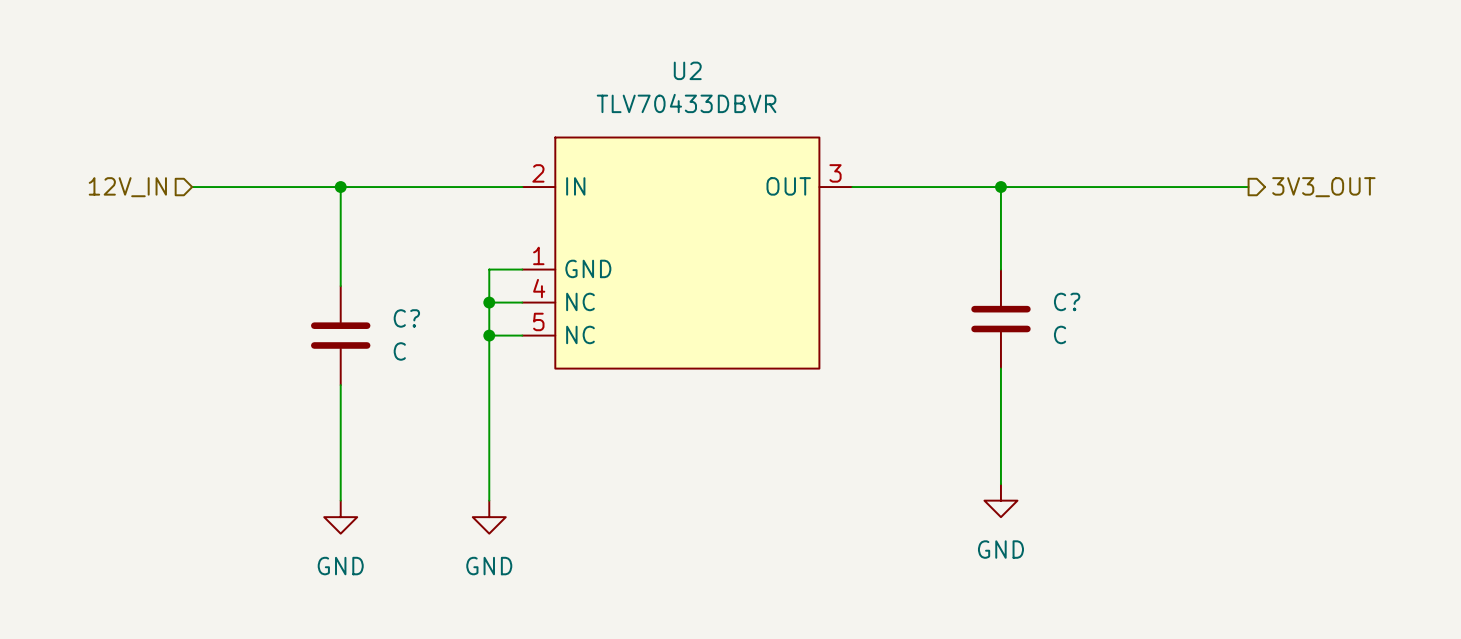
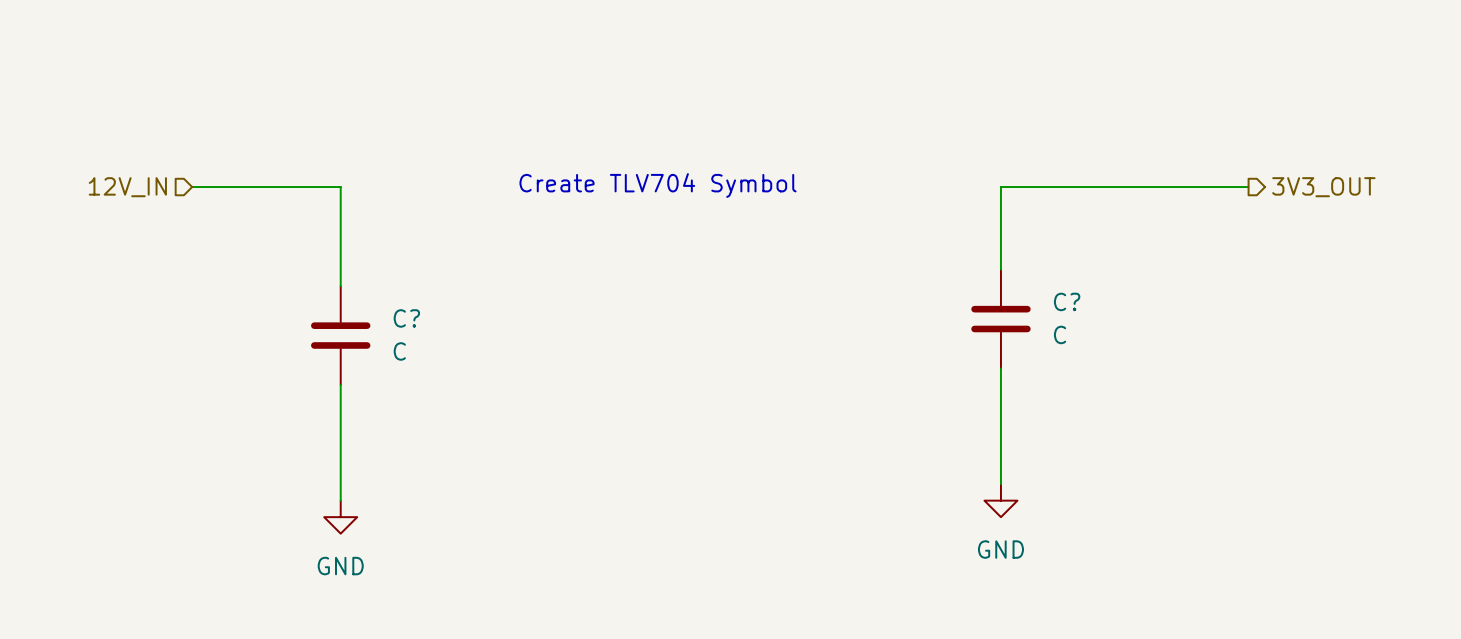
text: none -> Create TLV704 Symbol (658, 185)
wire: (340, 187) (522, 187) -> none
junction: (340, 187) -> none
wire: (852, 187) (1000, 187) -> none
junction: (1000, 187) -> none
U2: TLV70433DBVR (687, 253) -> none
wire: (522, 269) (489, 269) (489, 500) -> none
wire: (489, 302) (522, 302) -> none
junction: (489, 302) -> none
wire: (489, 335) (522, 335) -> none
junction: (489, 335) -> none
power symbol: GND (489, 517) -> none

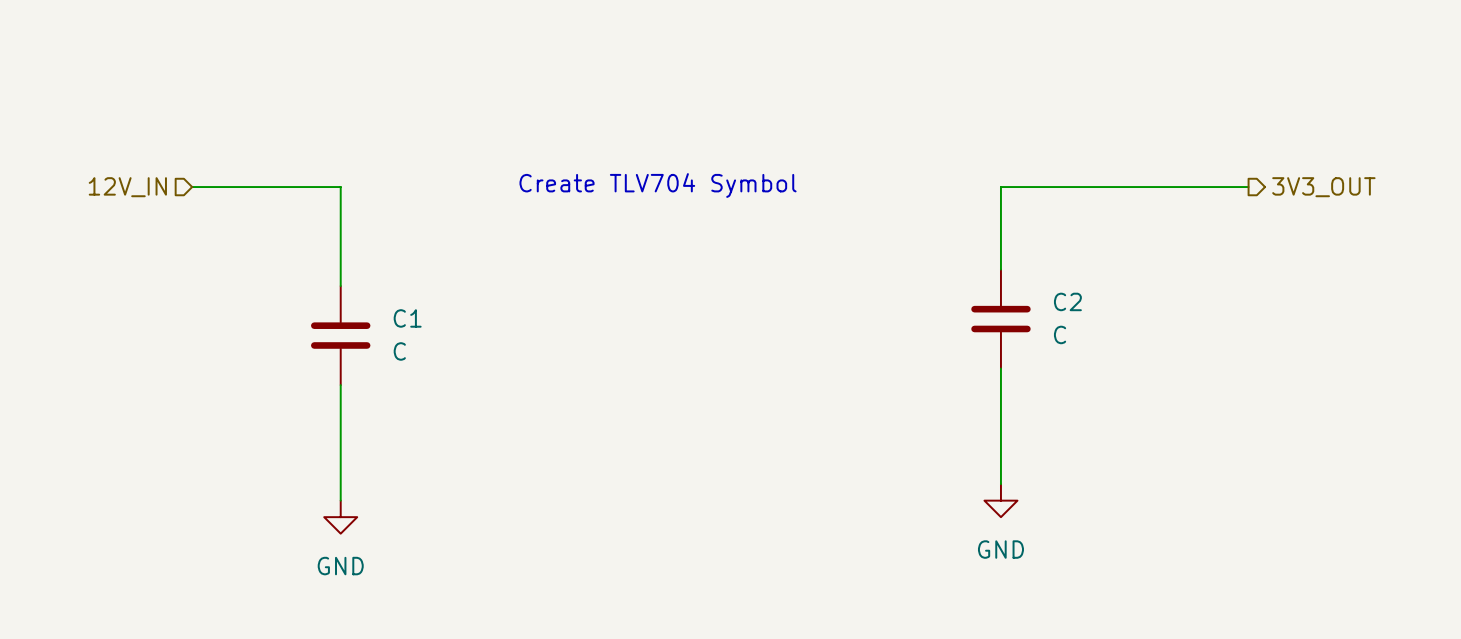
C? name: C? (1067, 301) -> C2 (1067, 301)
C? name: C? (406, 318) -> C1 (407, 318)

